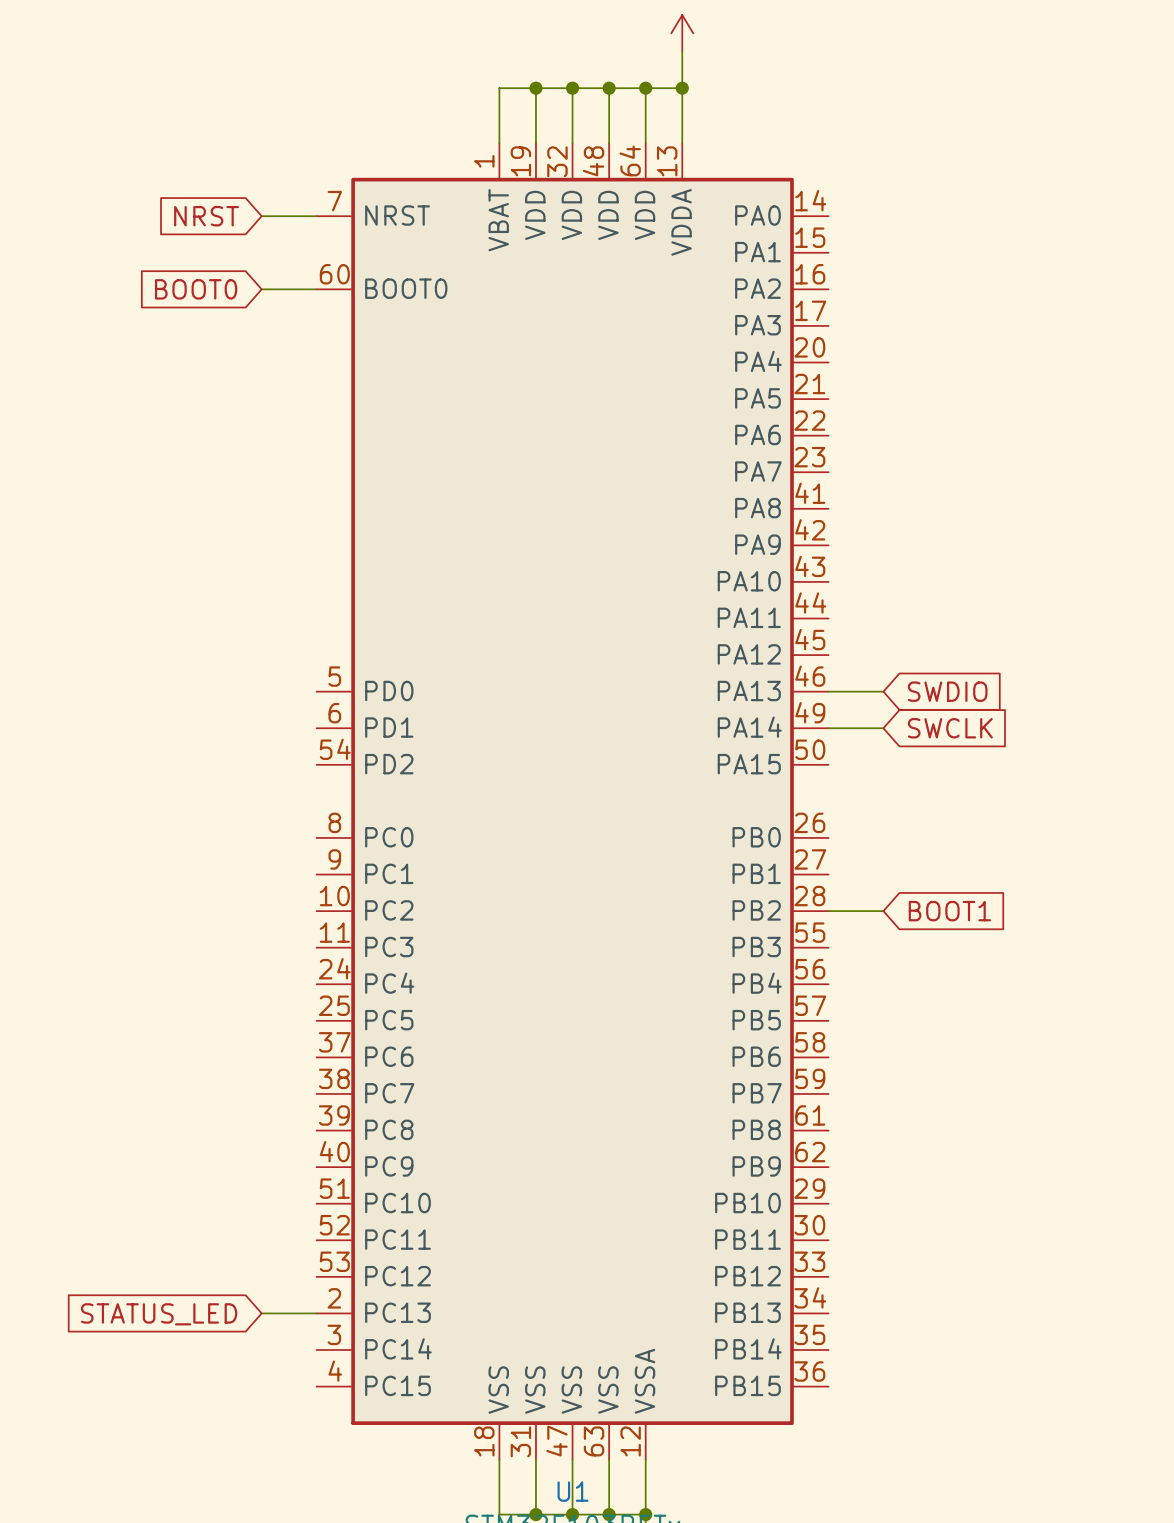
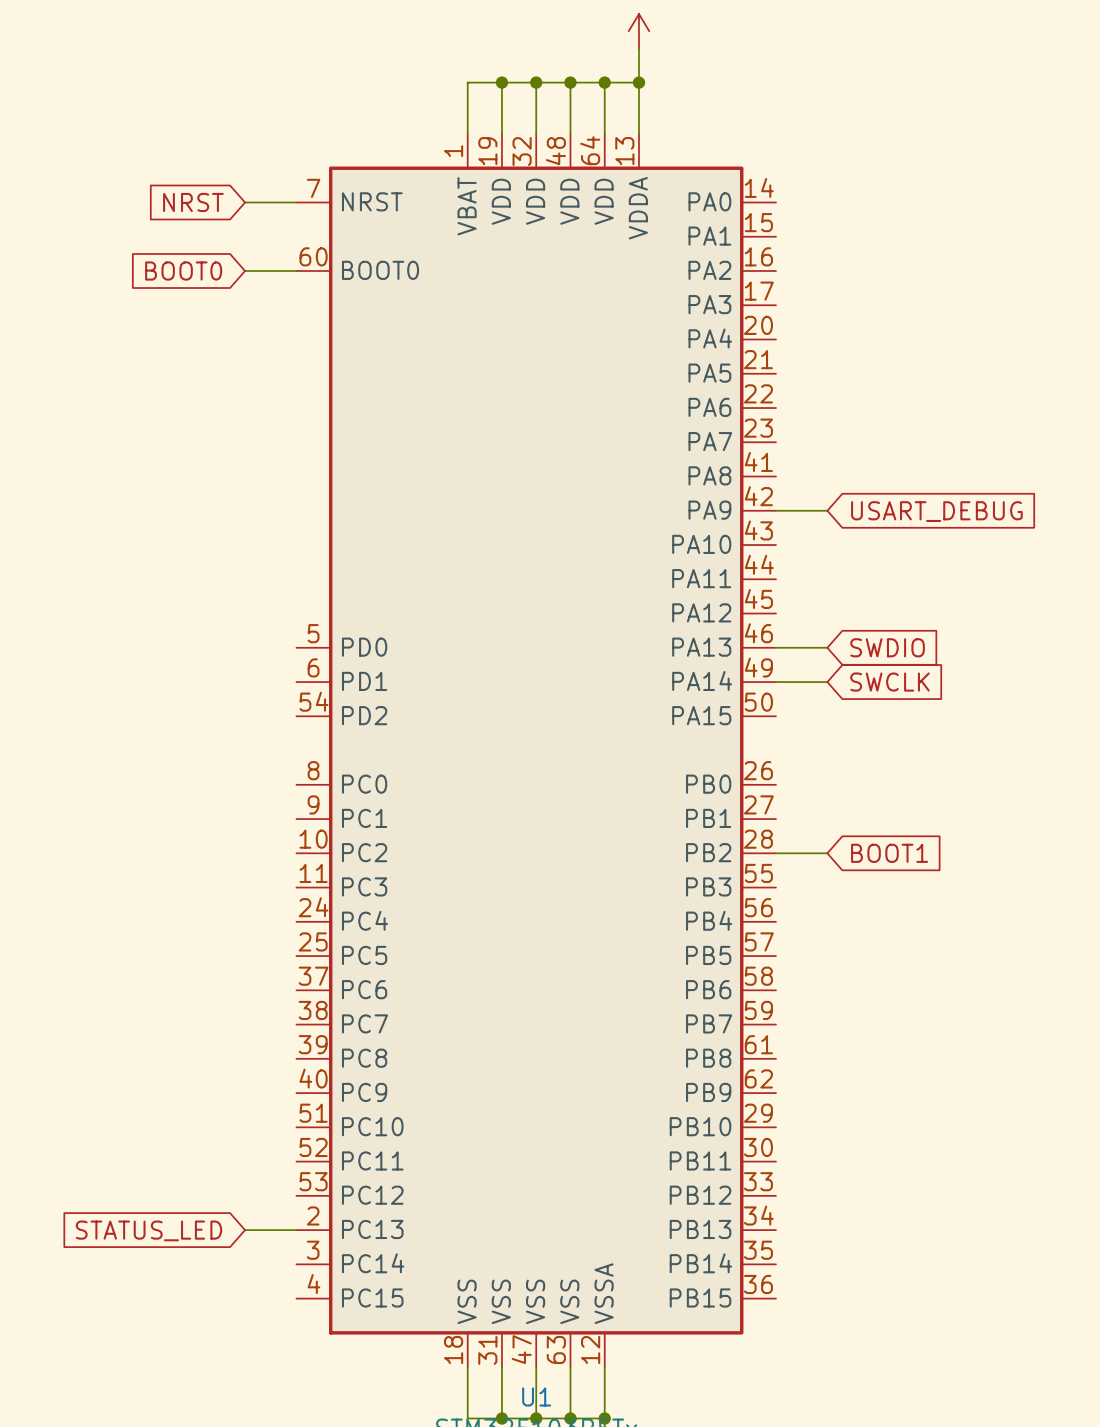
wire: none -> (776, 510) (827, 510)
global label: none -> USART_DEBUG (936, 511)

